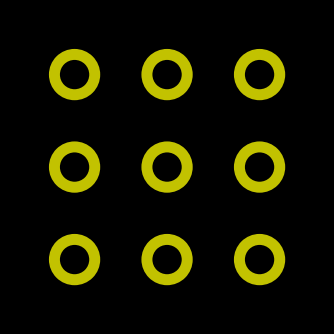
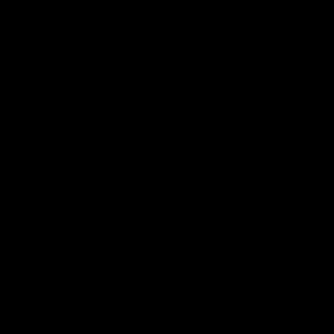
part: (74, 74) -> none
part: (167, 74) -> none
part: (259, 74) -> none
part: (74, 167) -> none
part: (167, 167) -> none
part: (259, 167) -> none
part: (74, 259) -> none
part: (167, 259) -> none
part: (259, 259) -> none

